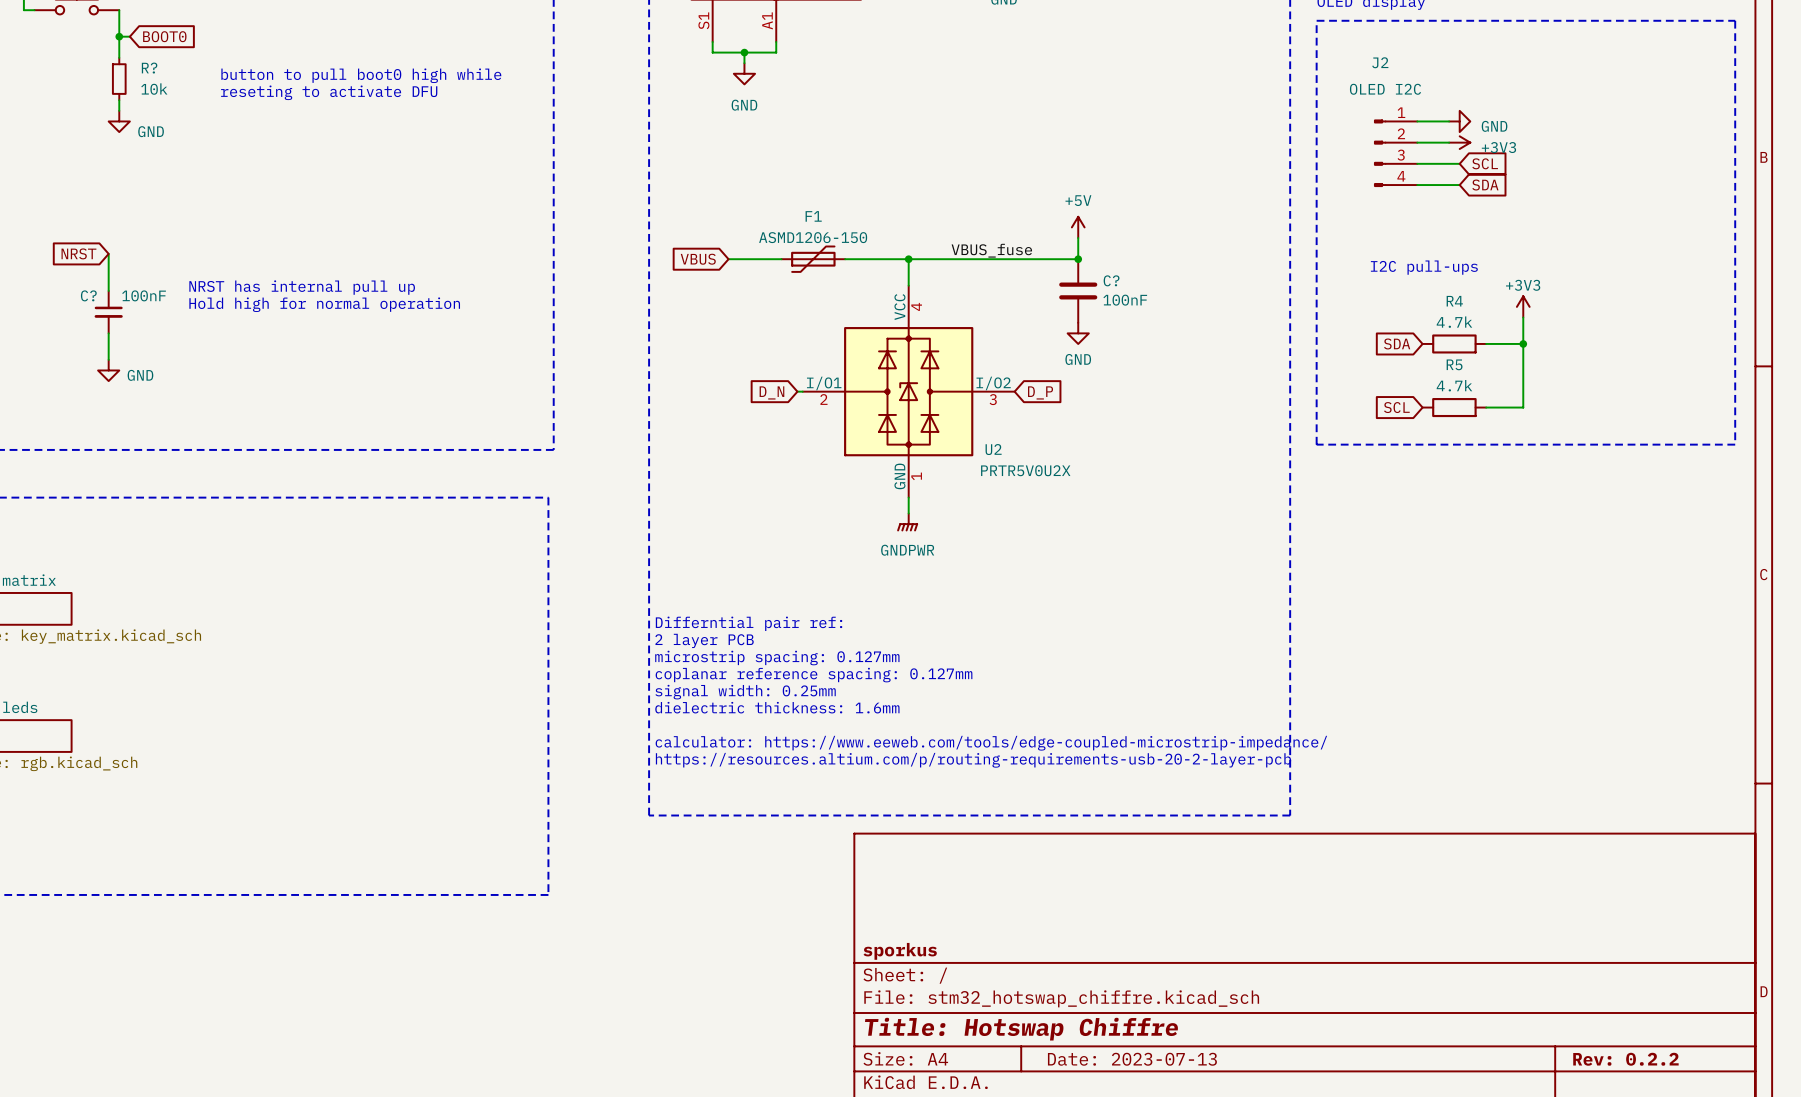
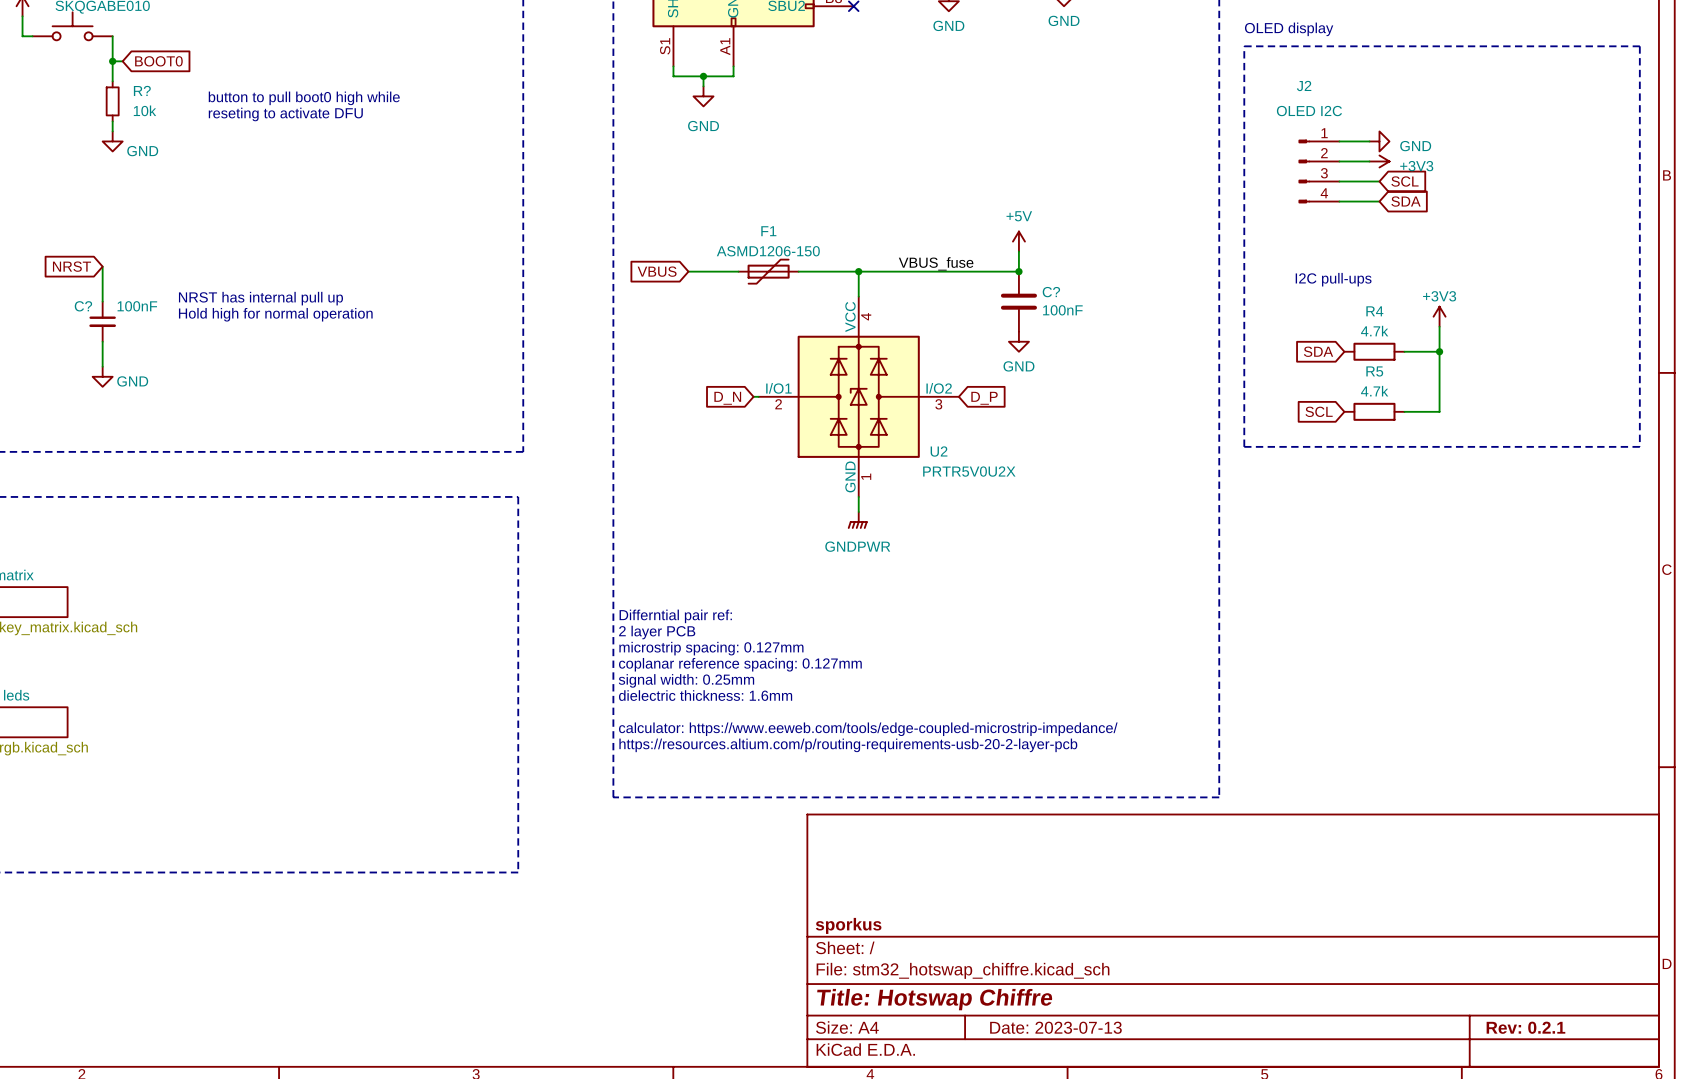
title block: Rev: 0.2.2 (1625, 1059) -> Rev: 0.2.1 (1525, 1027)

